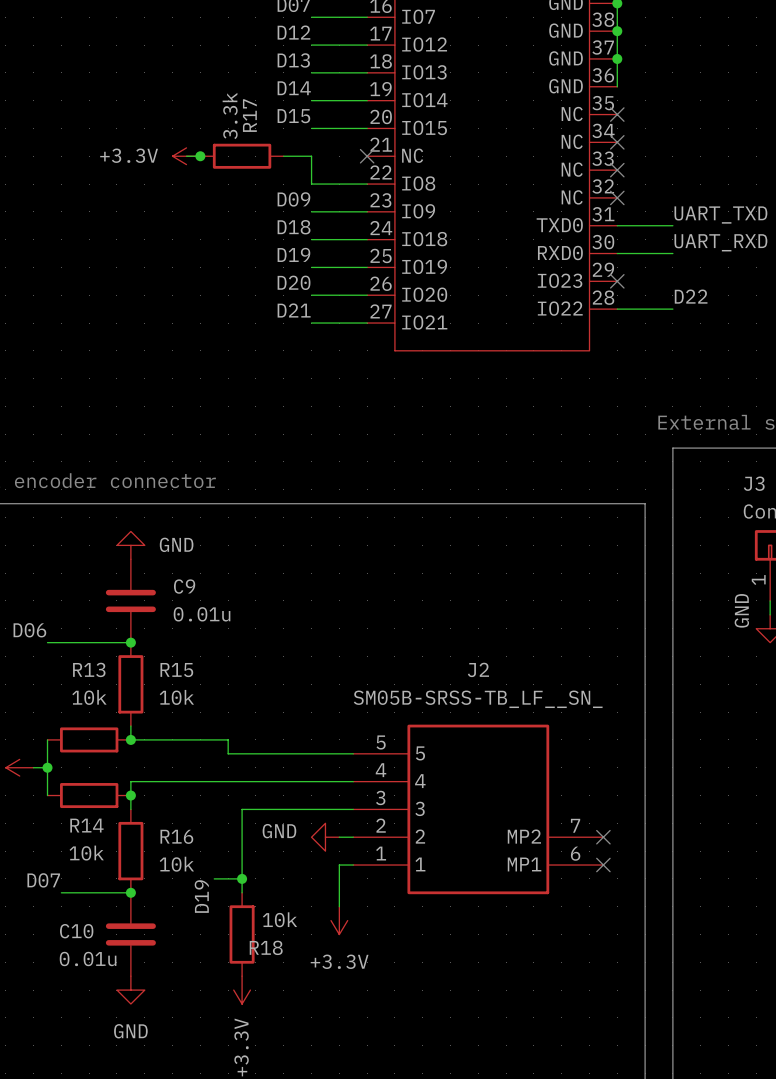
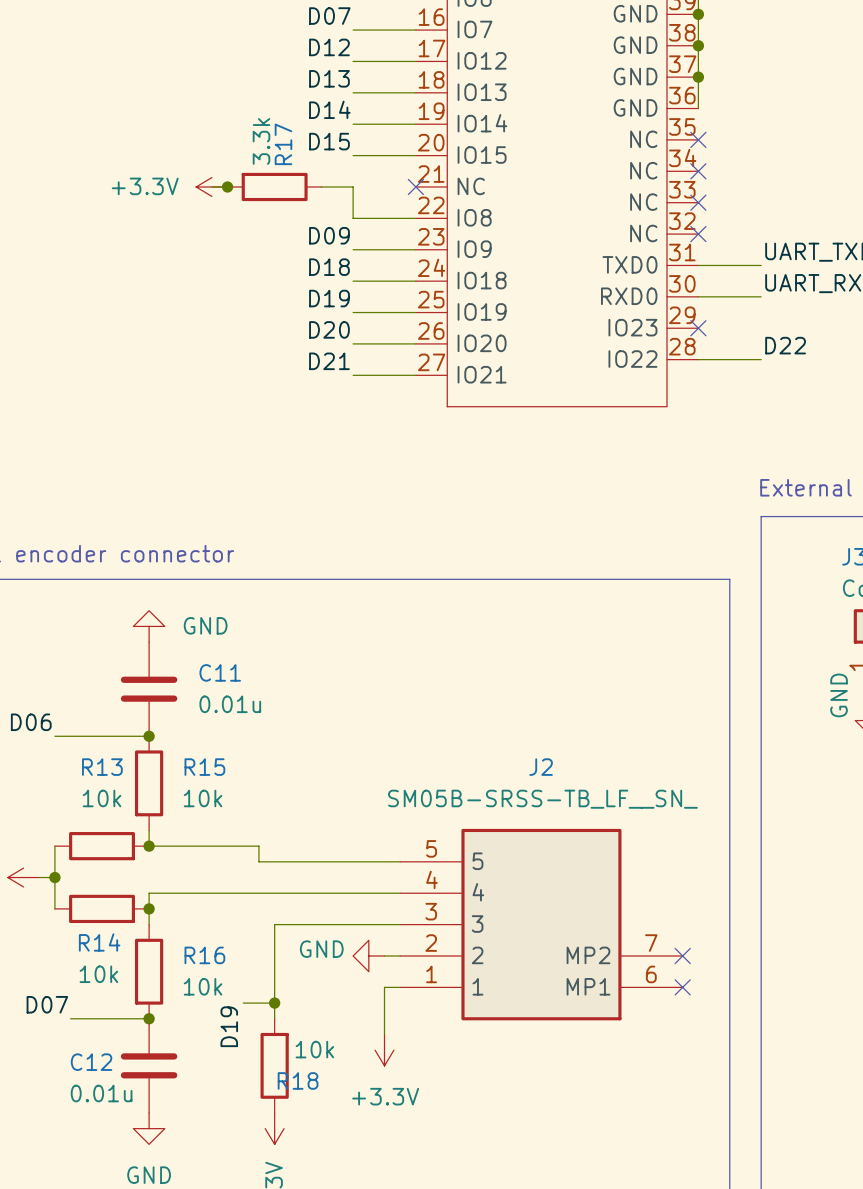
C9 name: C9 (184, 586) -> C11 (220, 672)
C10 name: C10 (76, 931) -> C12 (91, 1062)

